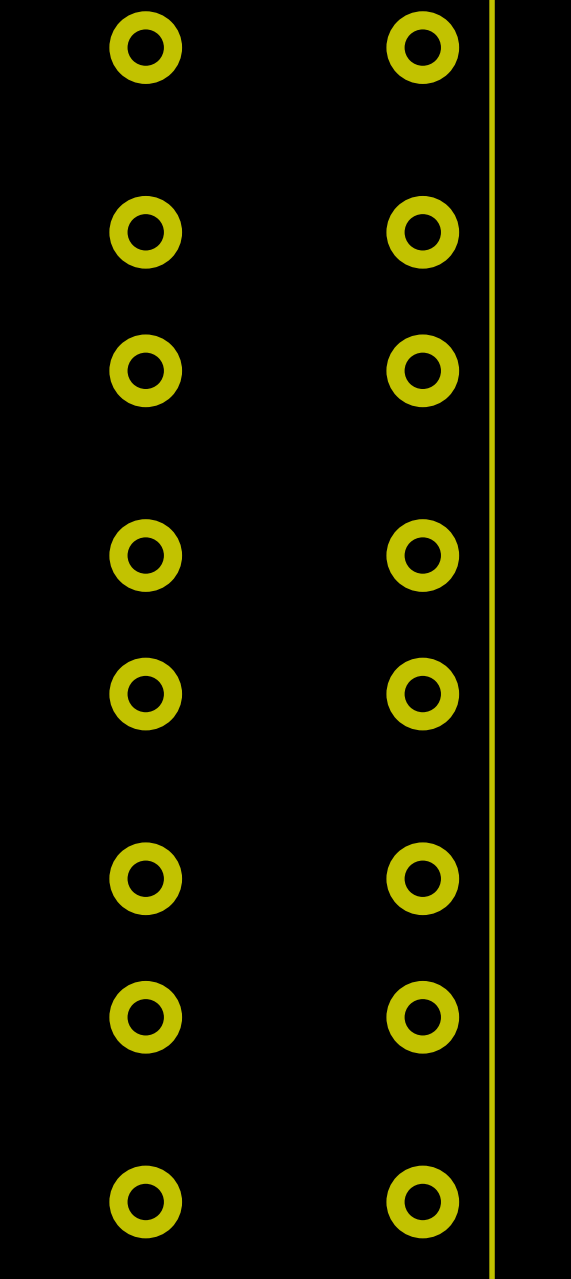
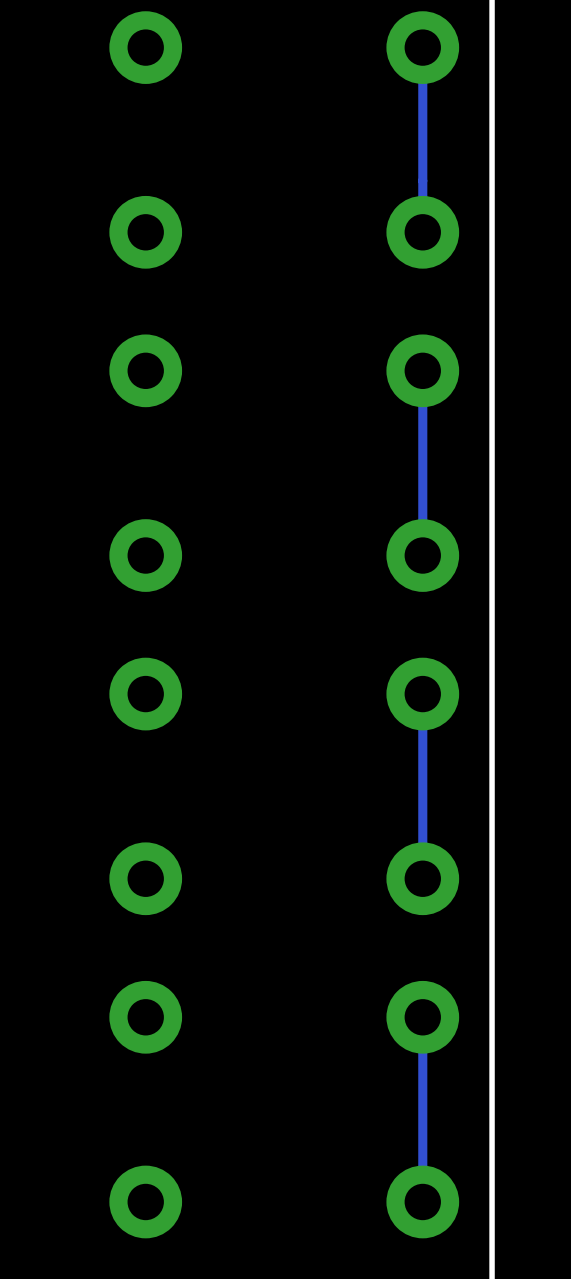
track: none -> (422, 47) (422, 232)
track: none -> (422, 370) (422, 555)
track: none -> (422, 694) (422, 878)
track: none -> (422, 1017) (422, 1201)

